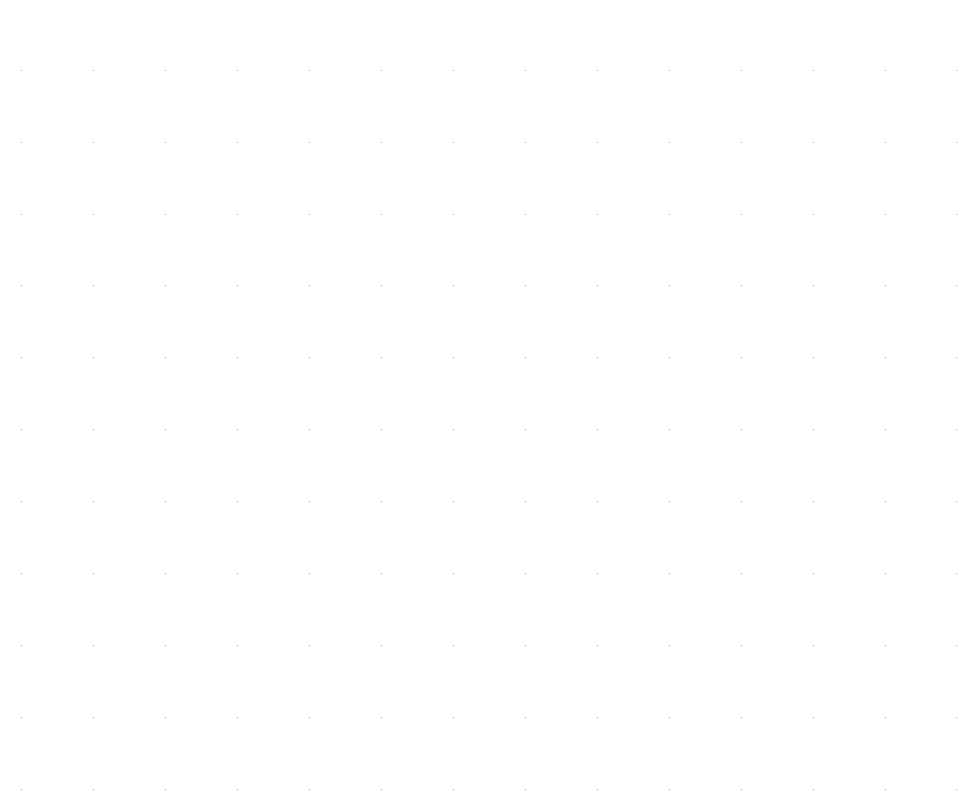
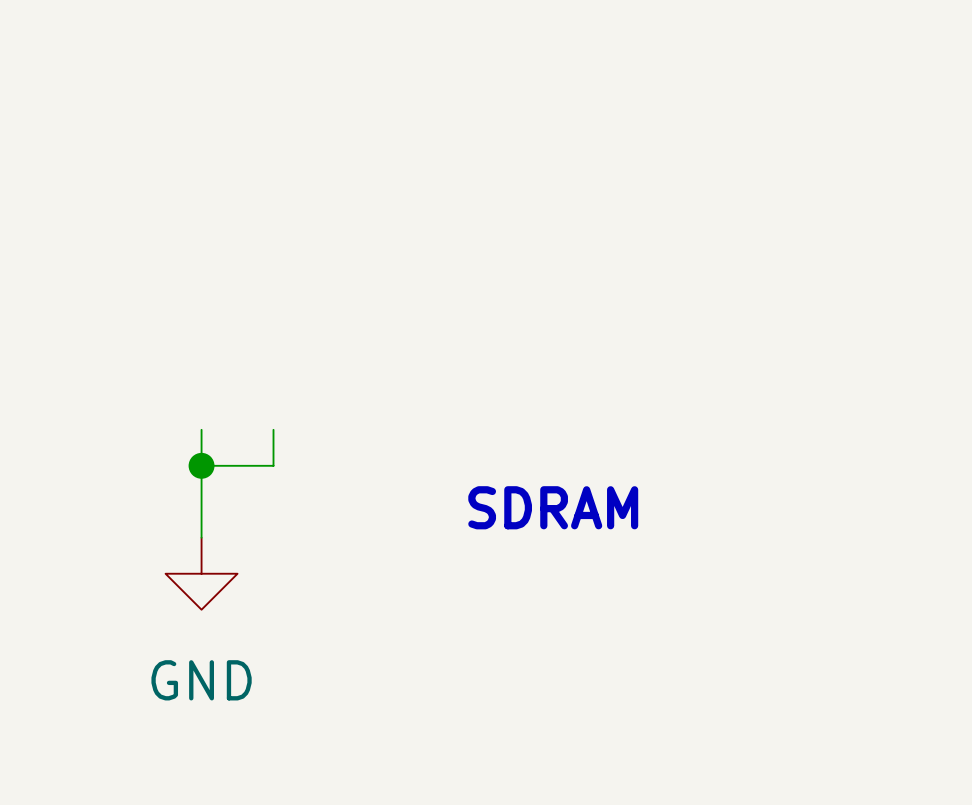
wire: none -> (201, 429) (201, 537)
wire: none -> (273, 429) (273, 465) (201, 465)
junction: none -> (201, 465)
text: none -> SDRAM (553, 507)
power symbol: none -> GND (201, 573)

